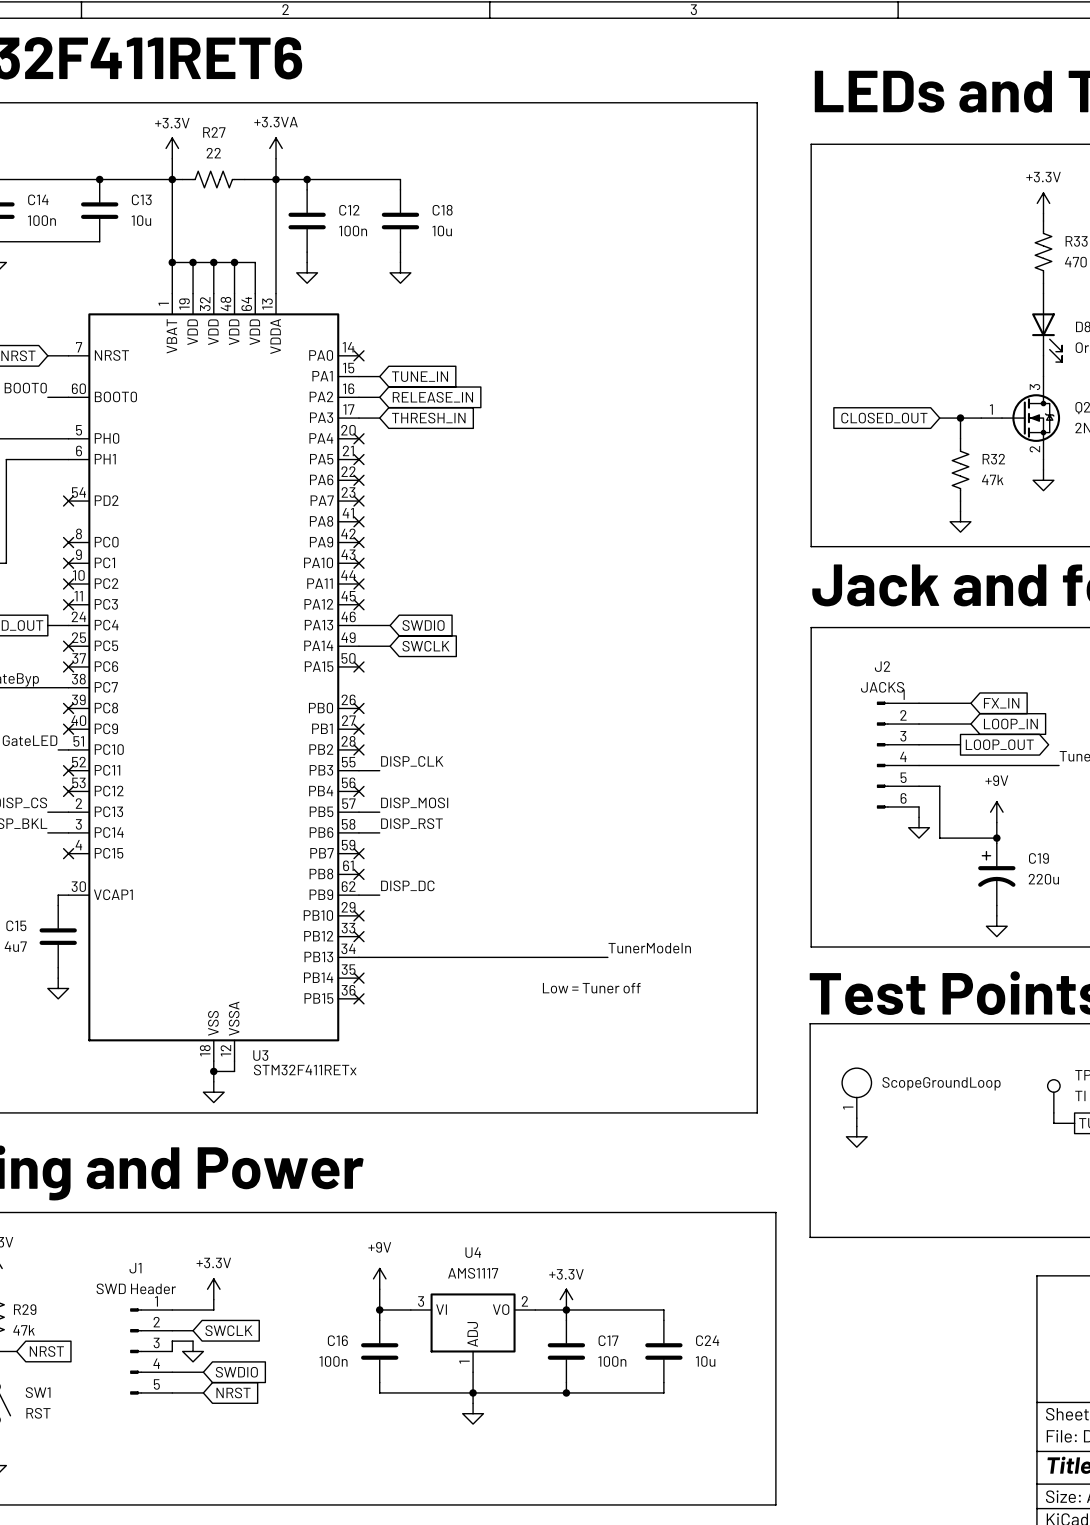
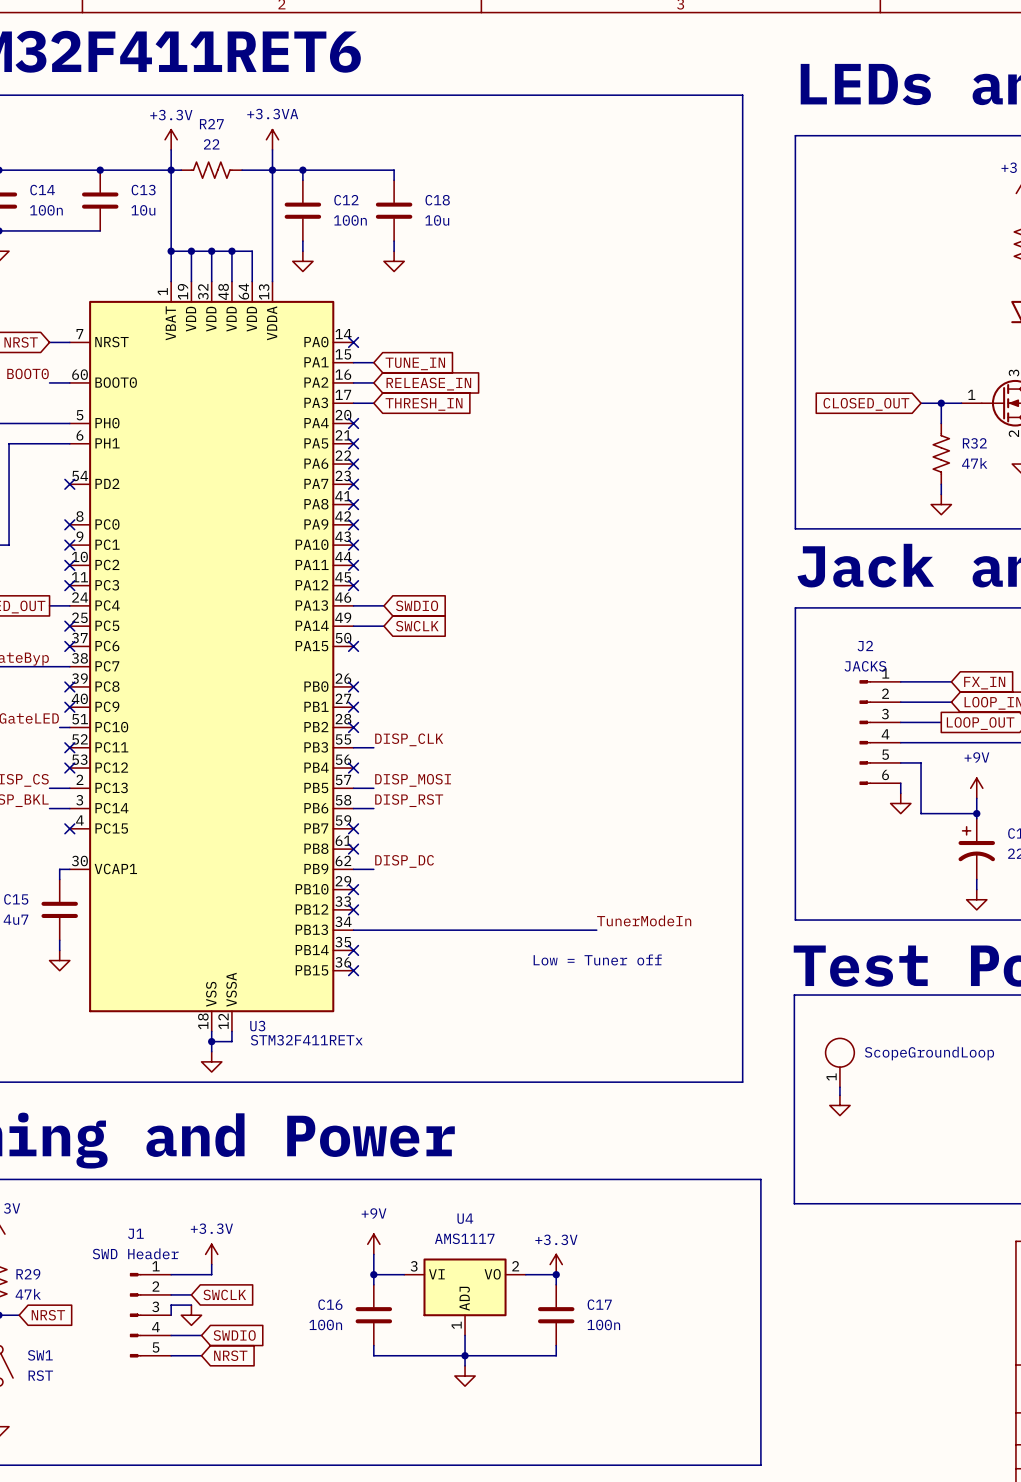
wire: (566, 1309) (663, 1309) (663, 1320) -> none
C24: 10u (663, 1351) -> none
wire: (663, 1382) (663, 1392) (566, 1392) -> none
junction: (566, 1392) -> none

